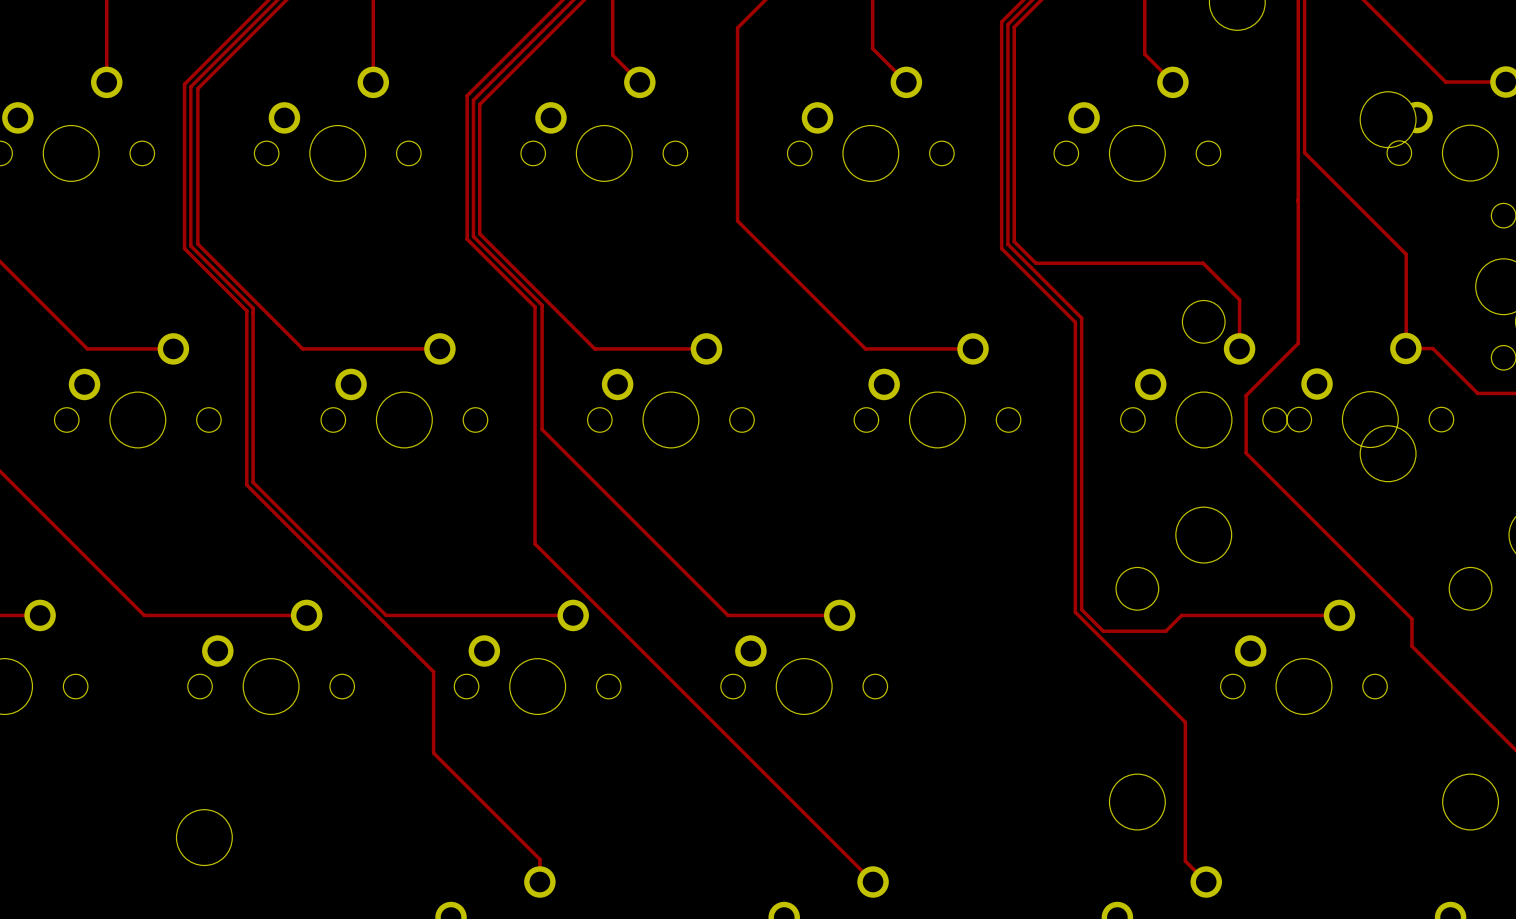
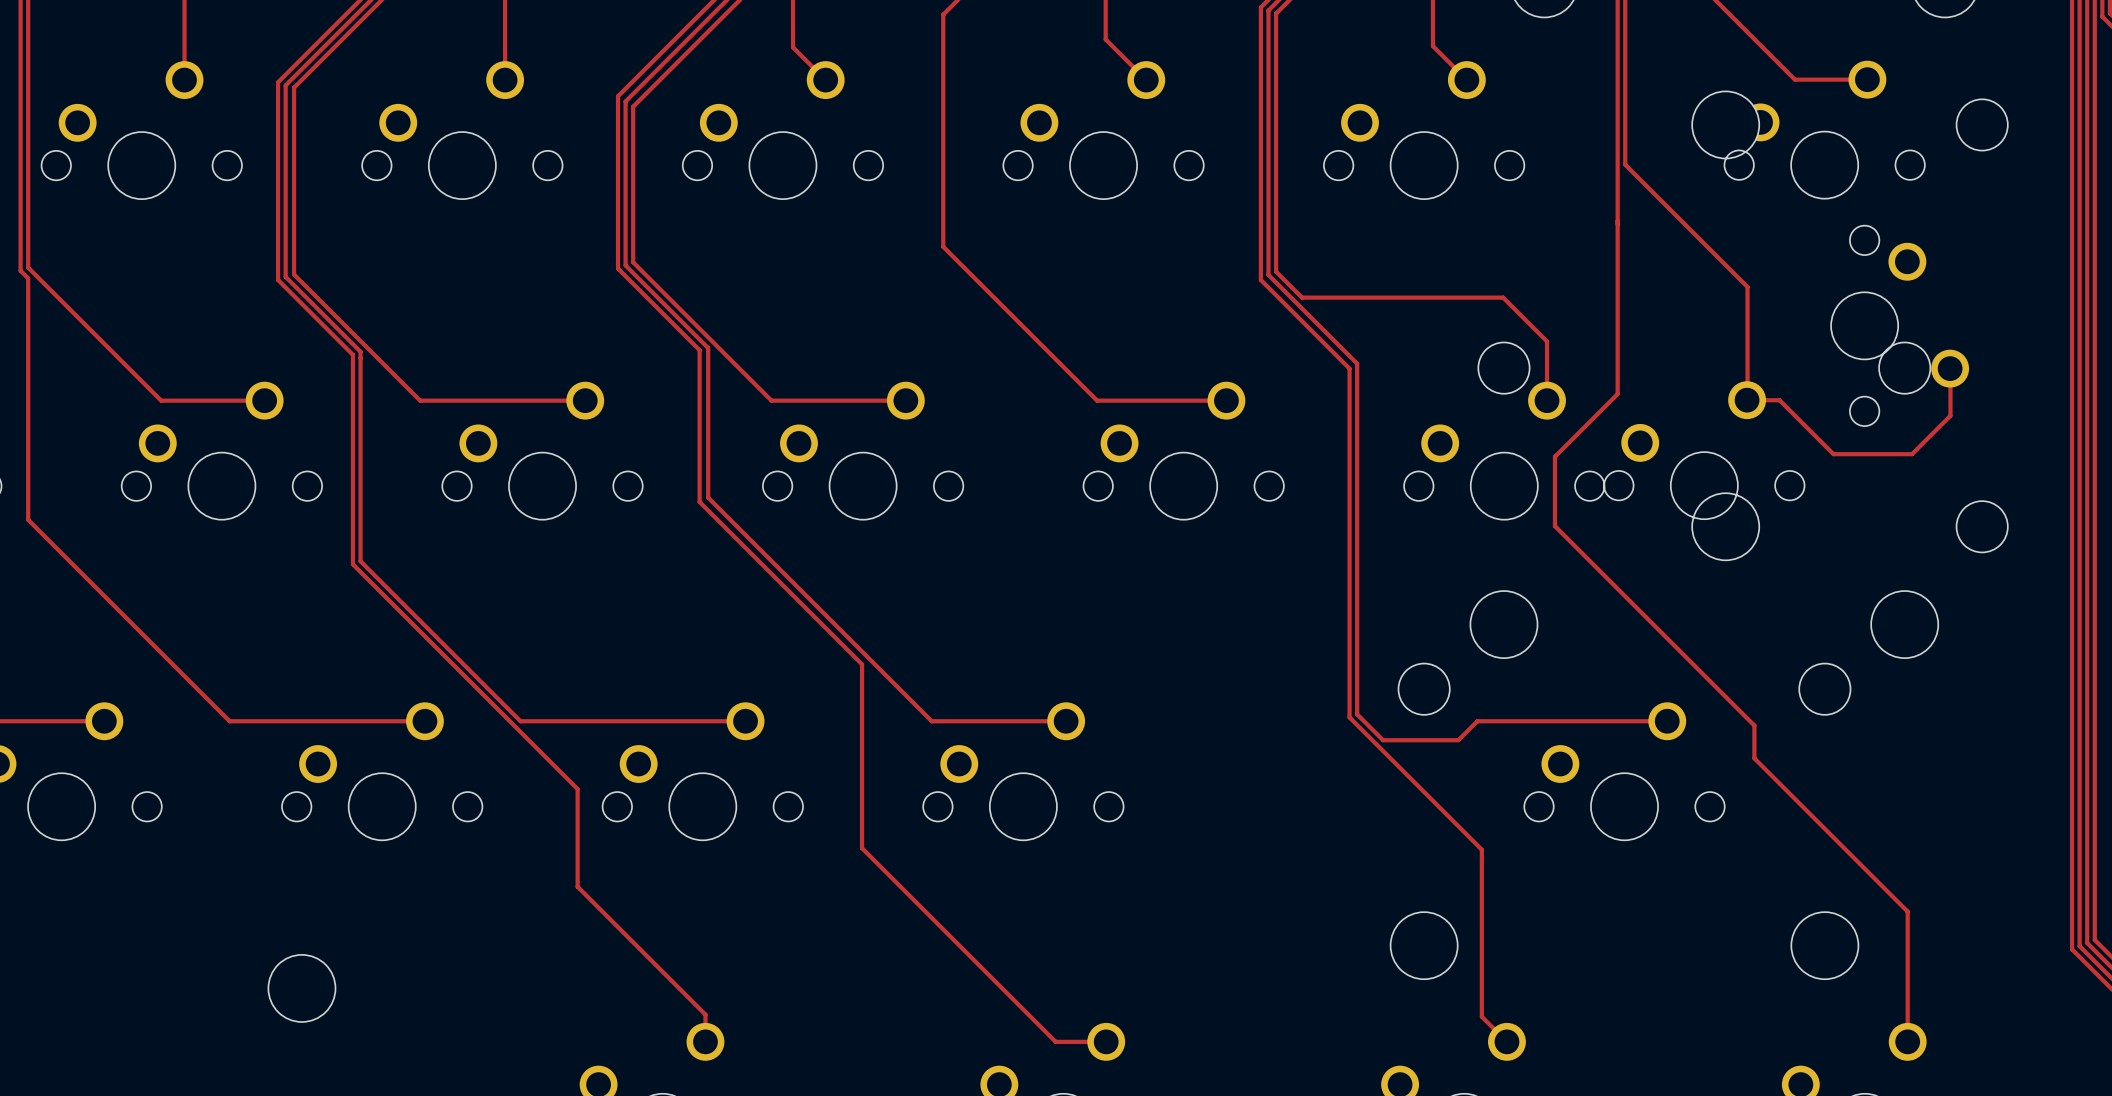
track: (535, 433) (535, 543) (873, 882) -> (699, 501) (862, 664) (862, 848) (1055, 1041) (1106, 1041)

